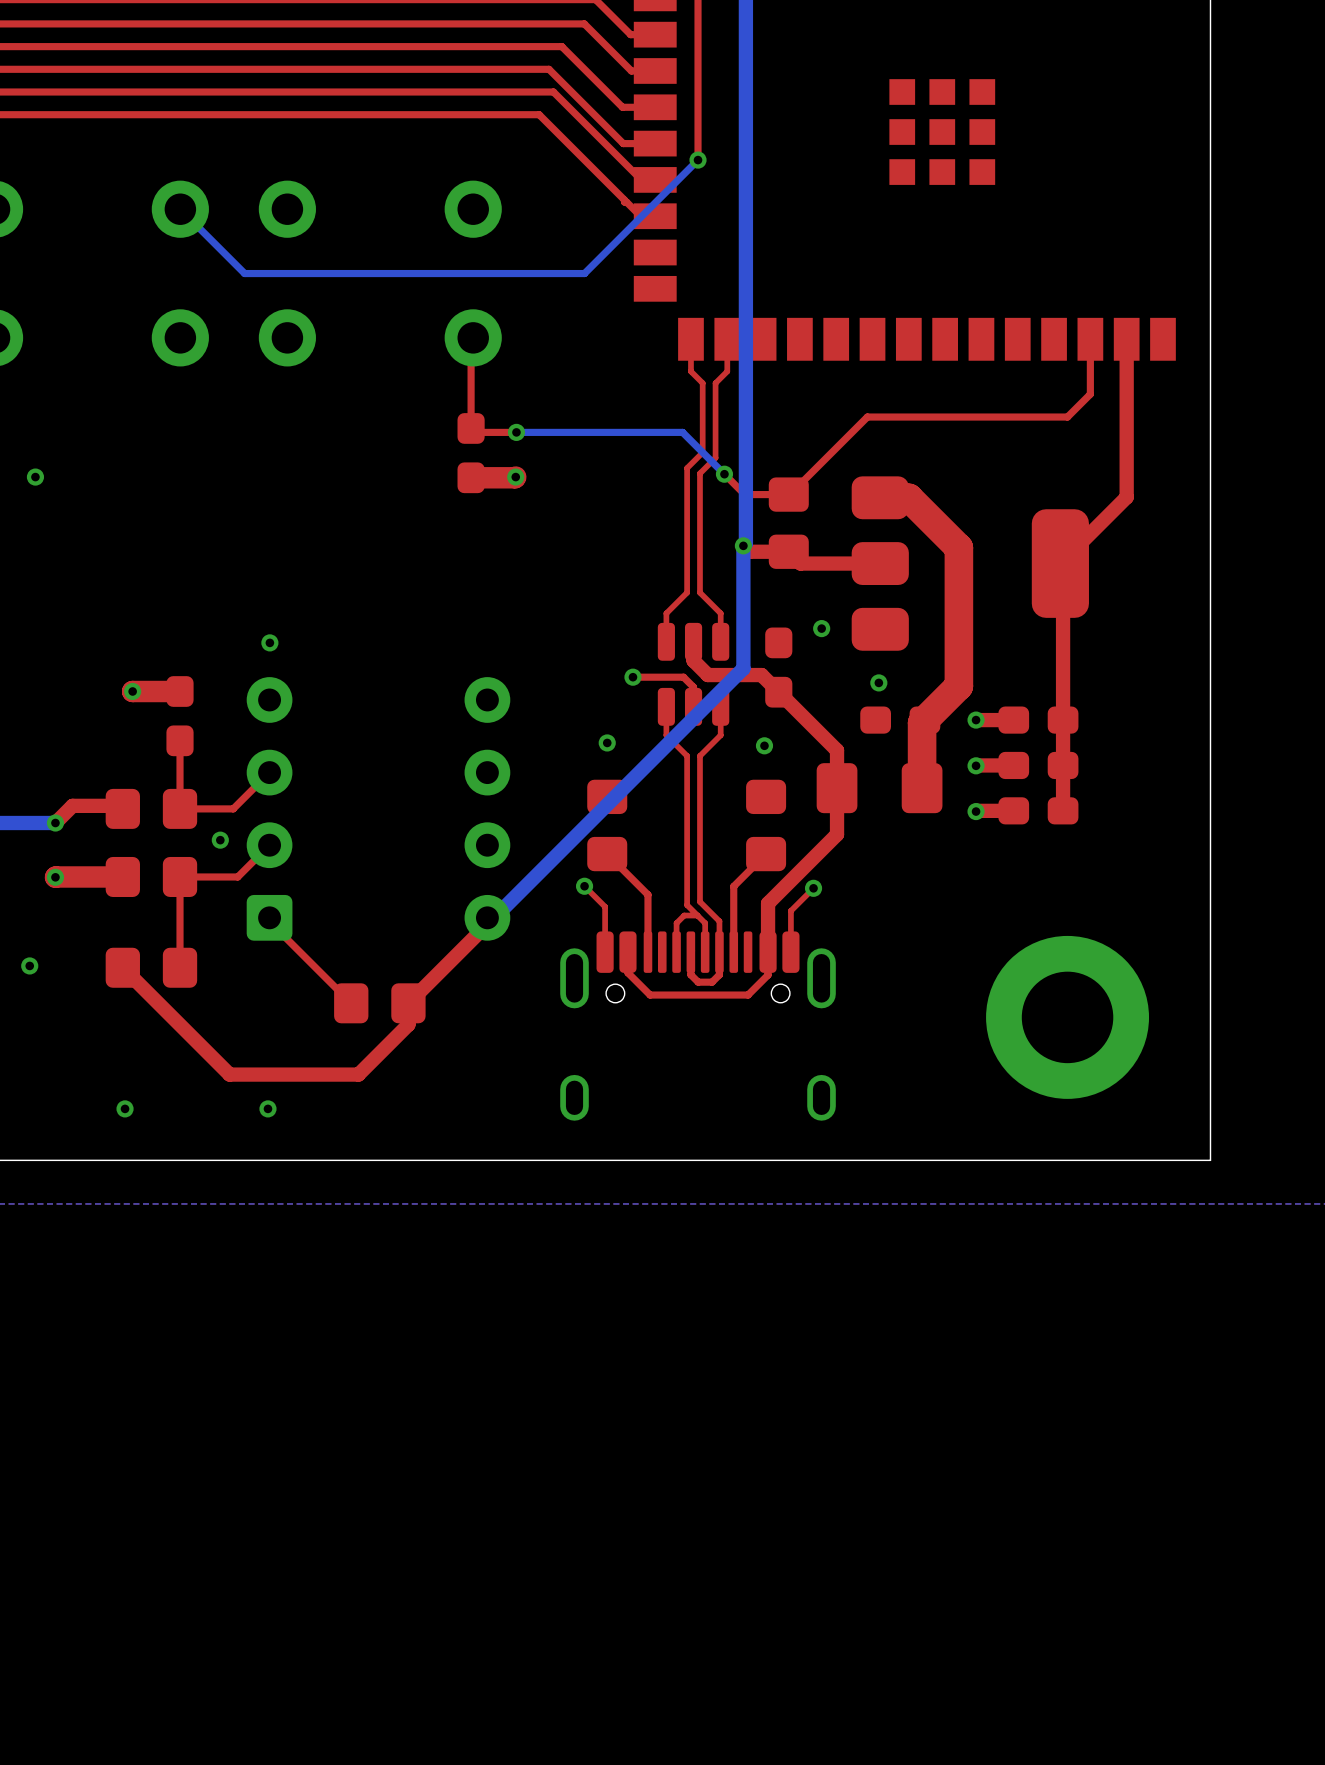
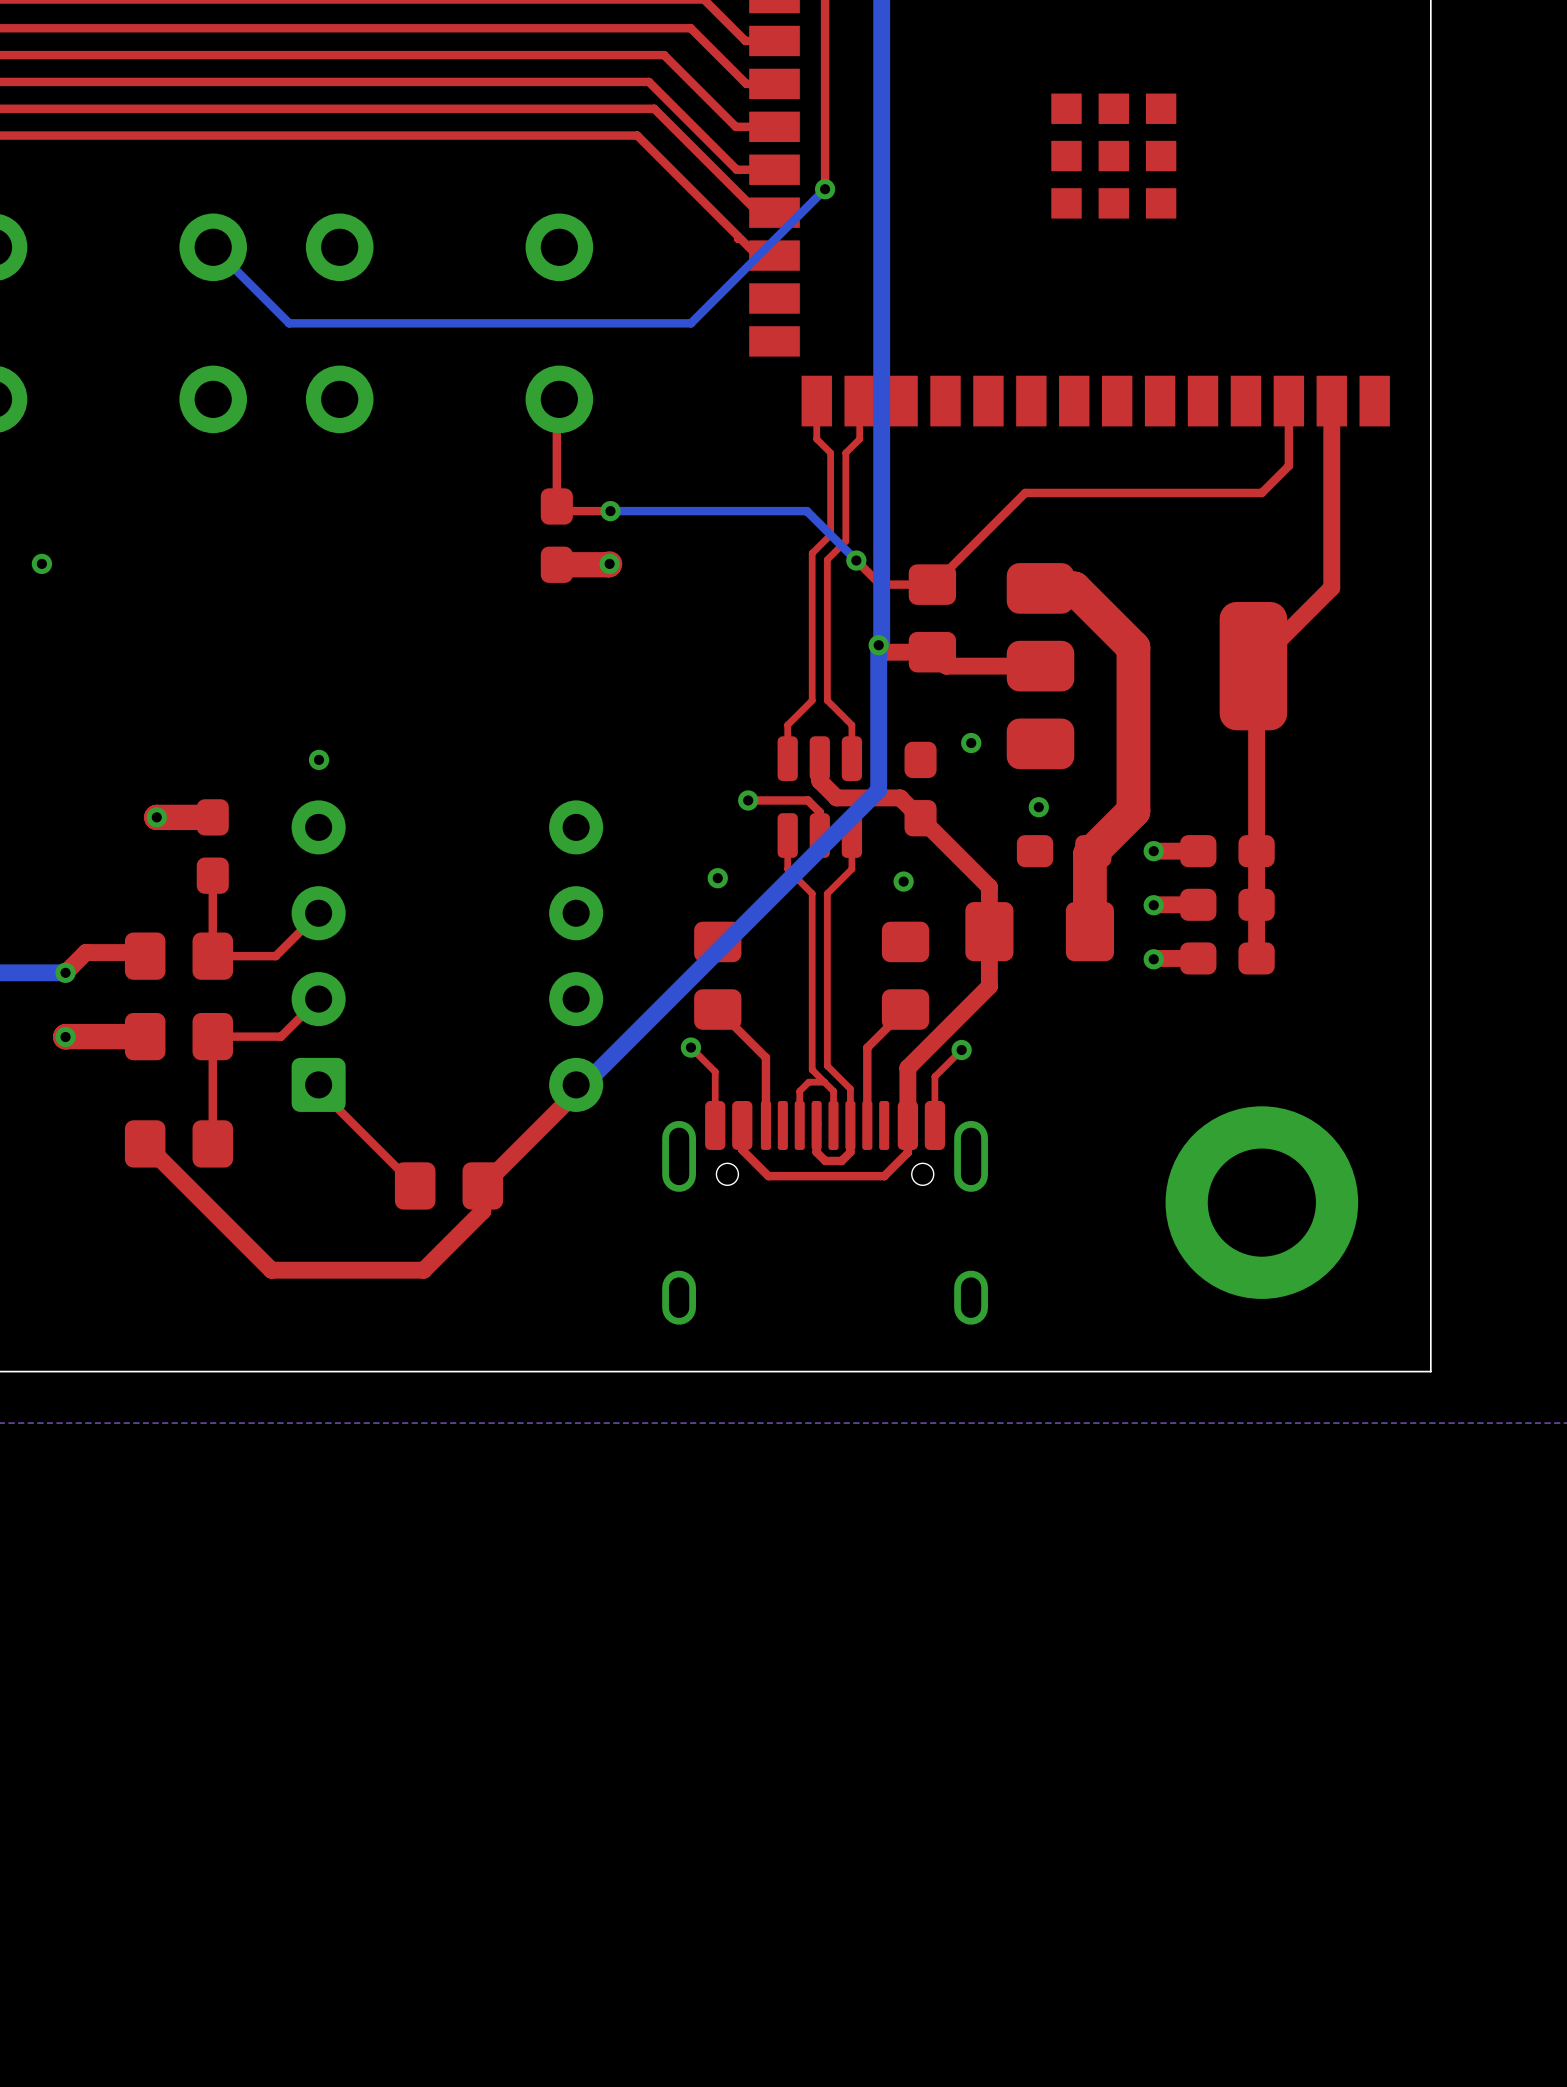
via: (220, 840) -> none
via: (29, 965) -> none
via: (125, 1108) -> none
via: (267, 1108) -> none

